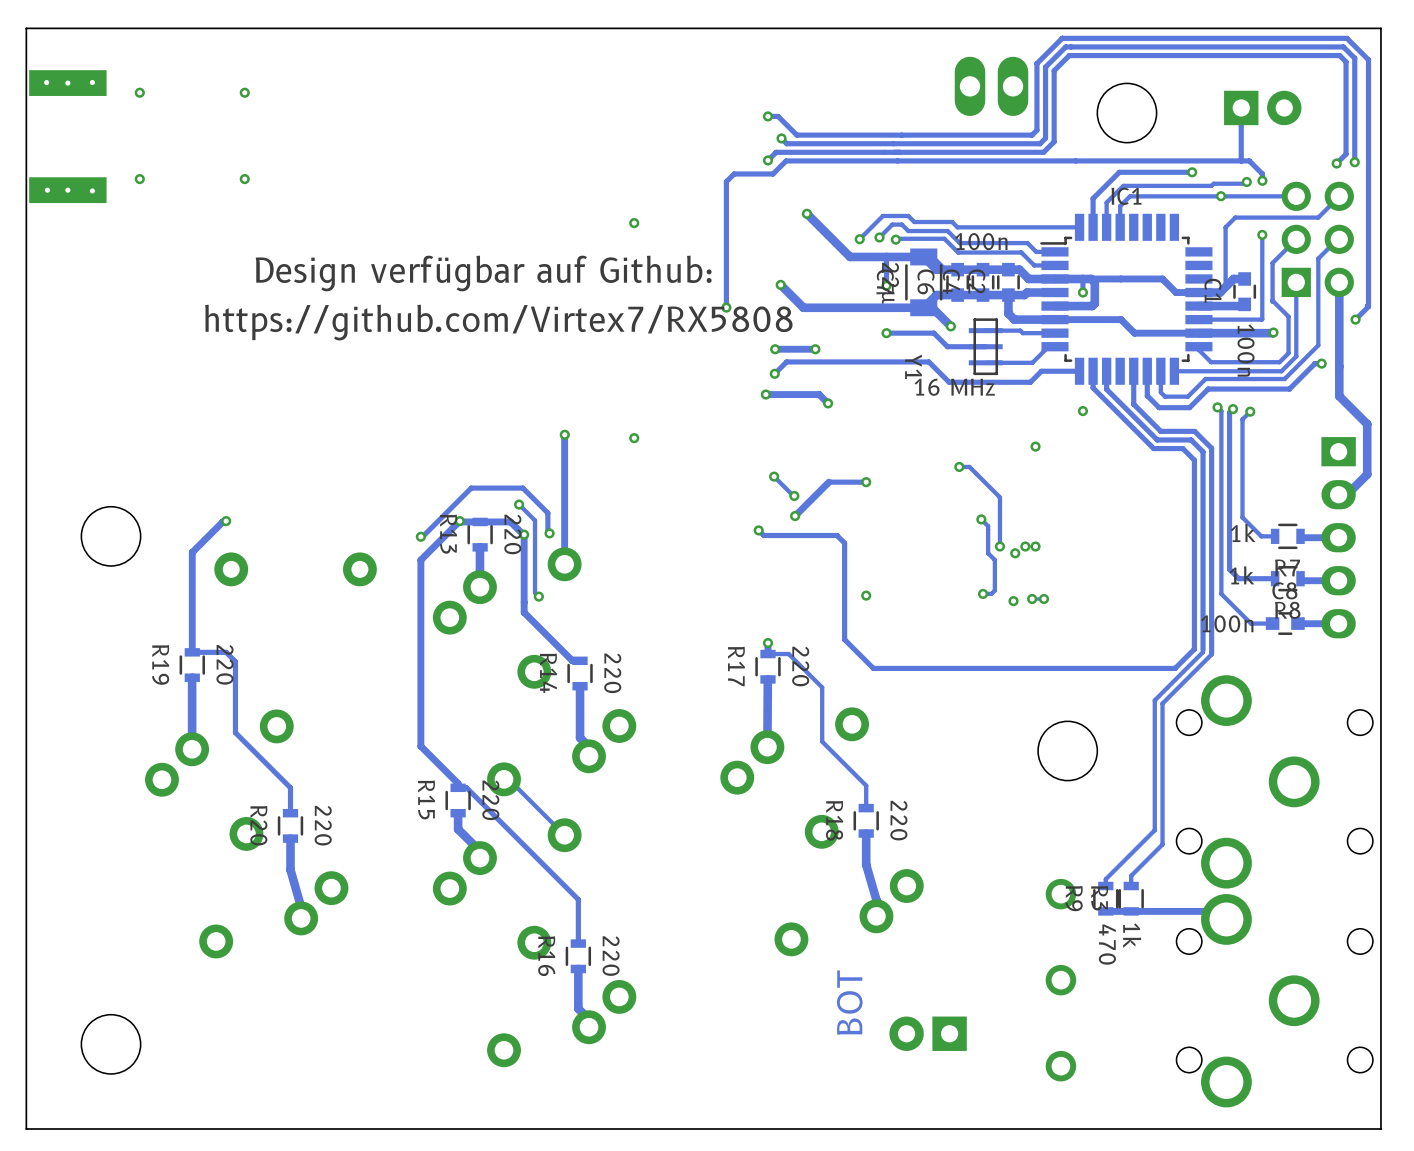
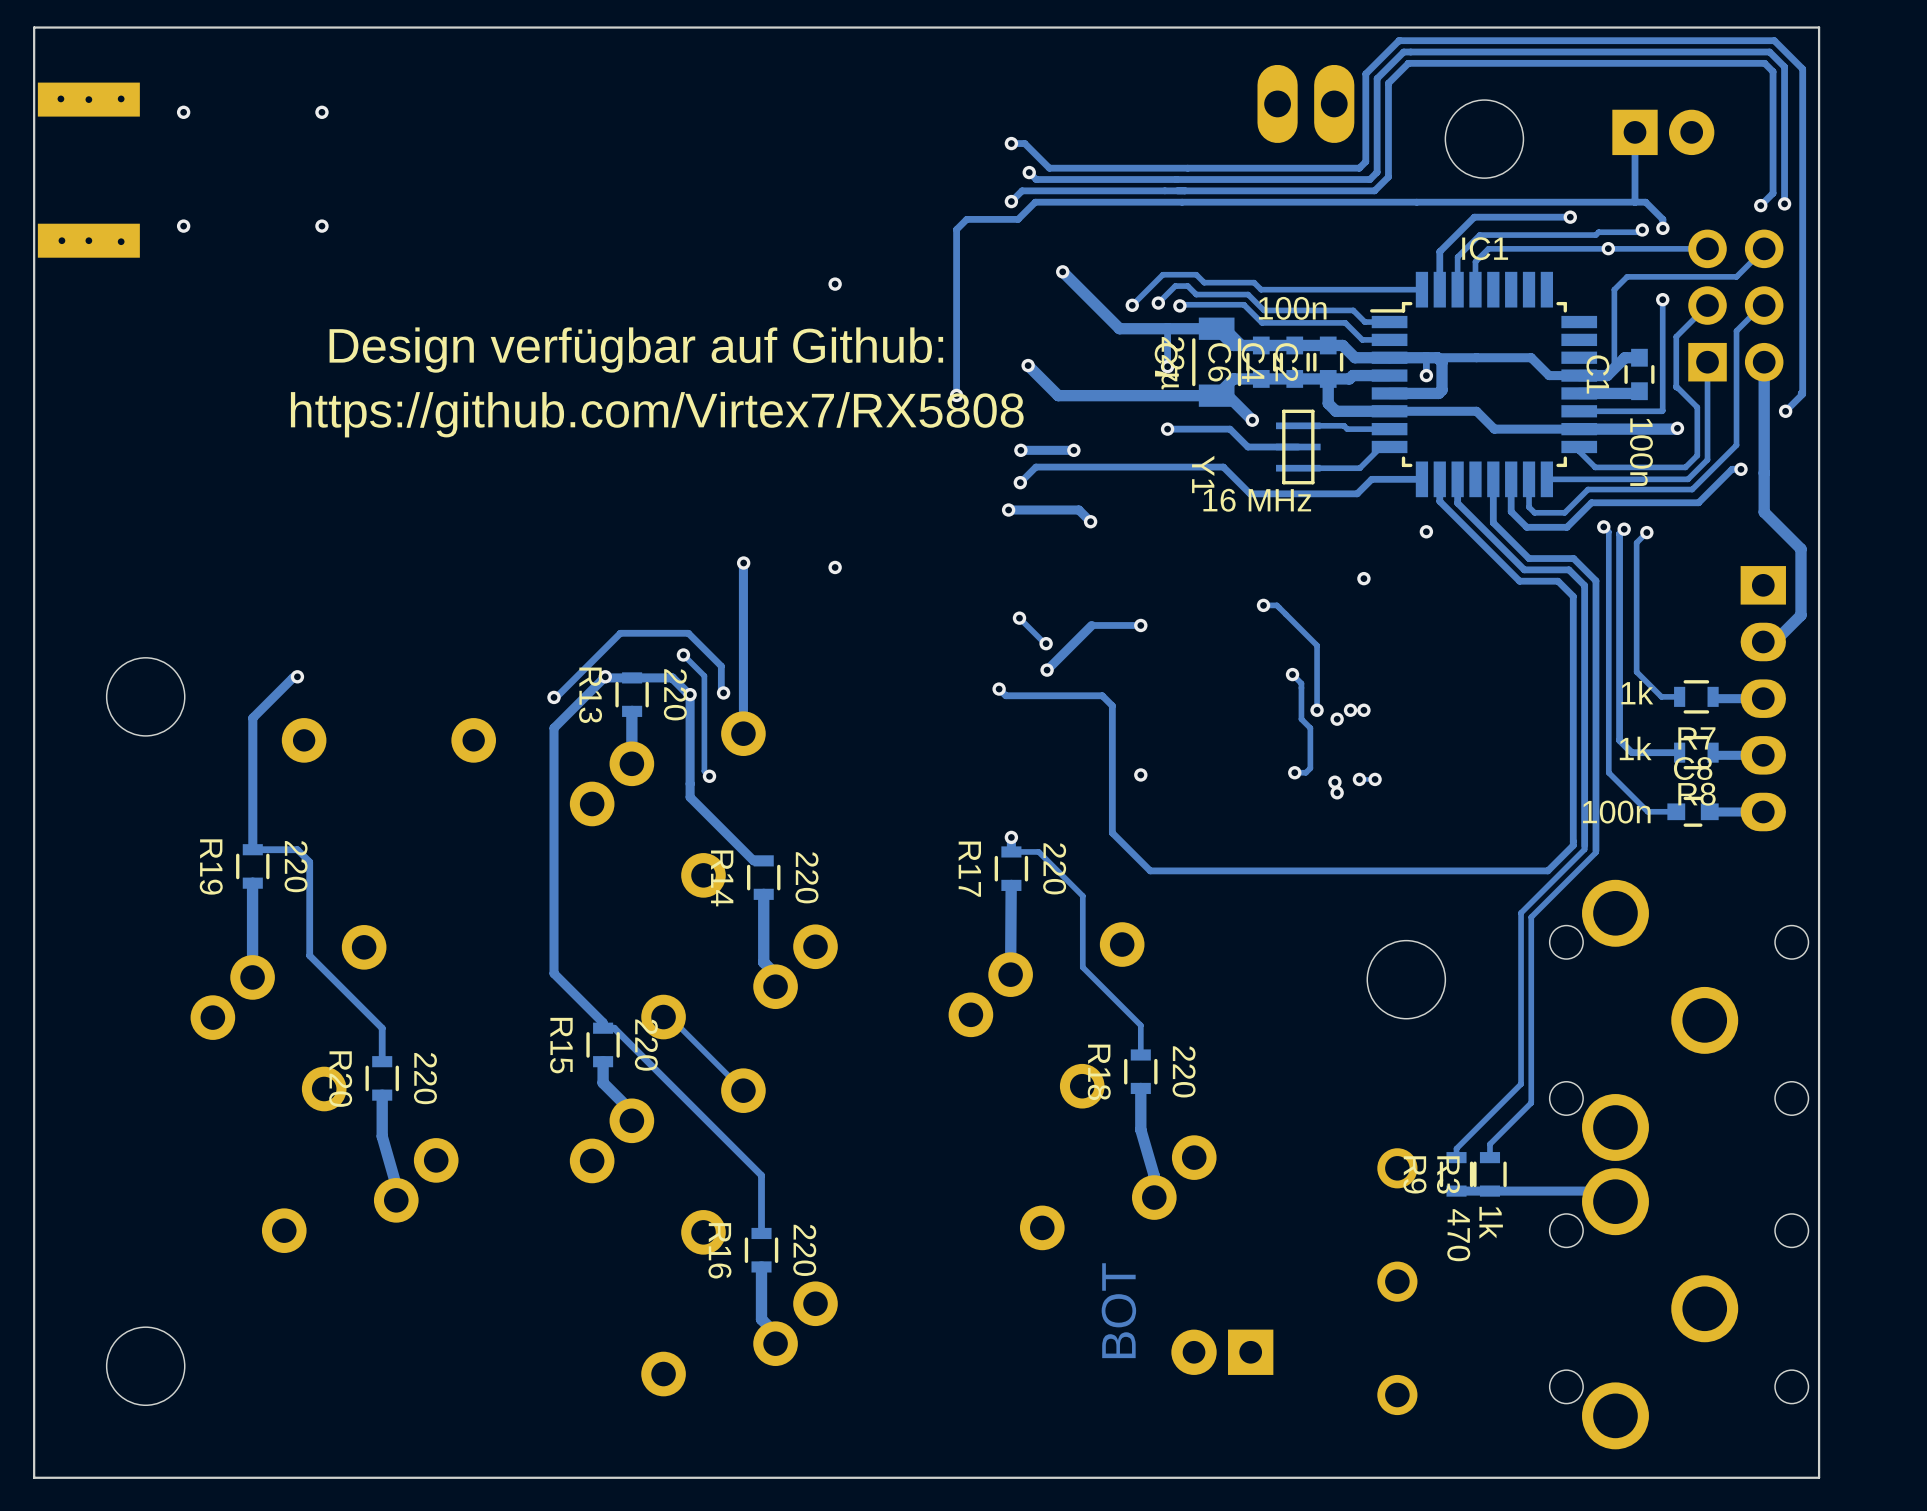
via: none -> (1337, 792)

